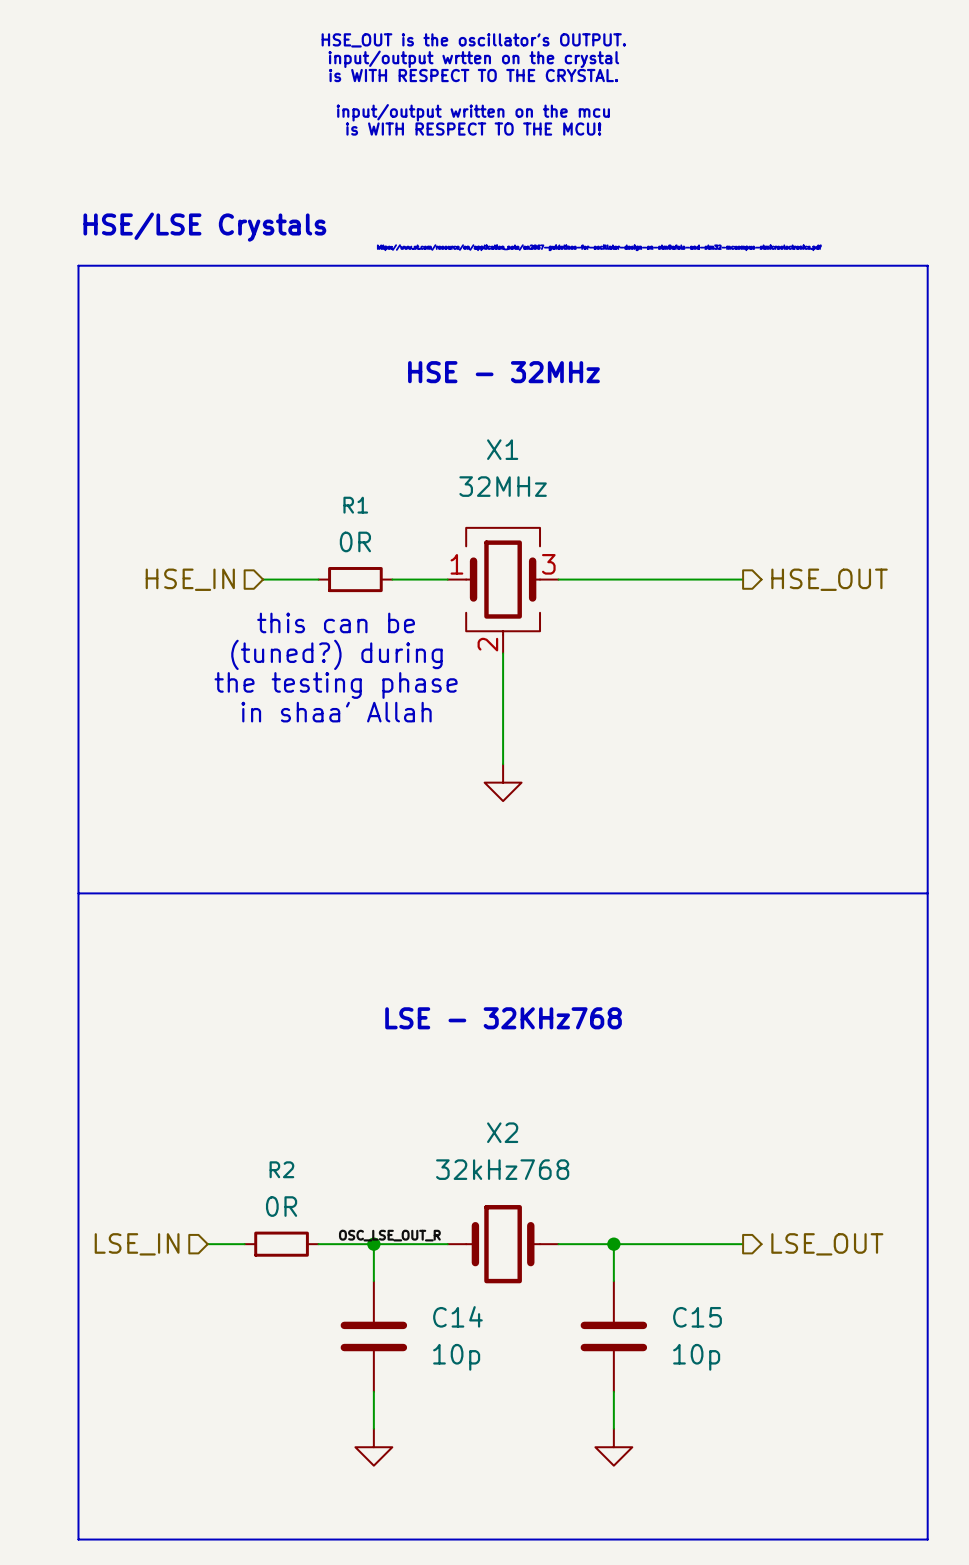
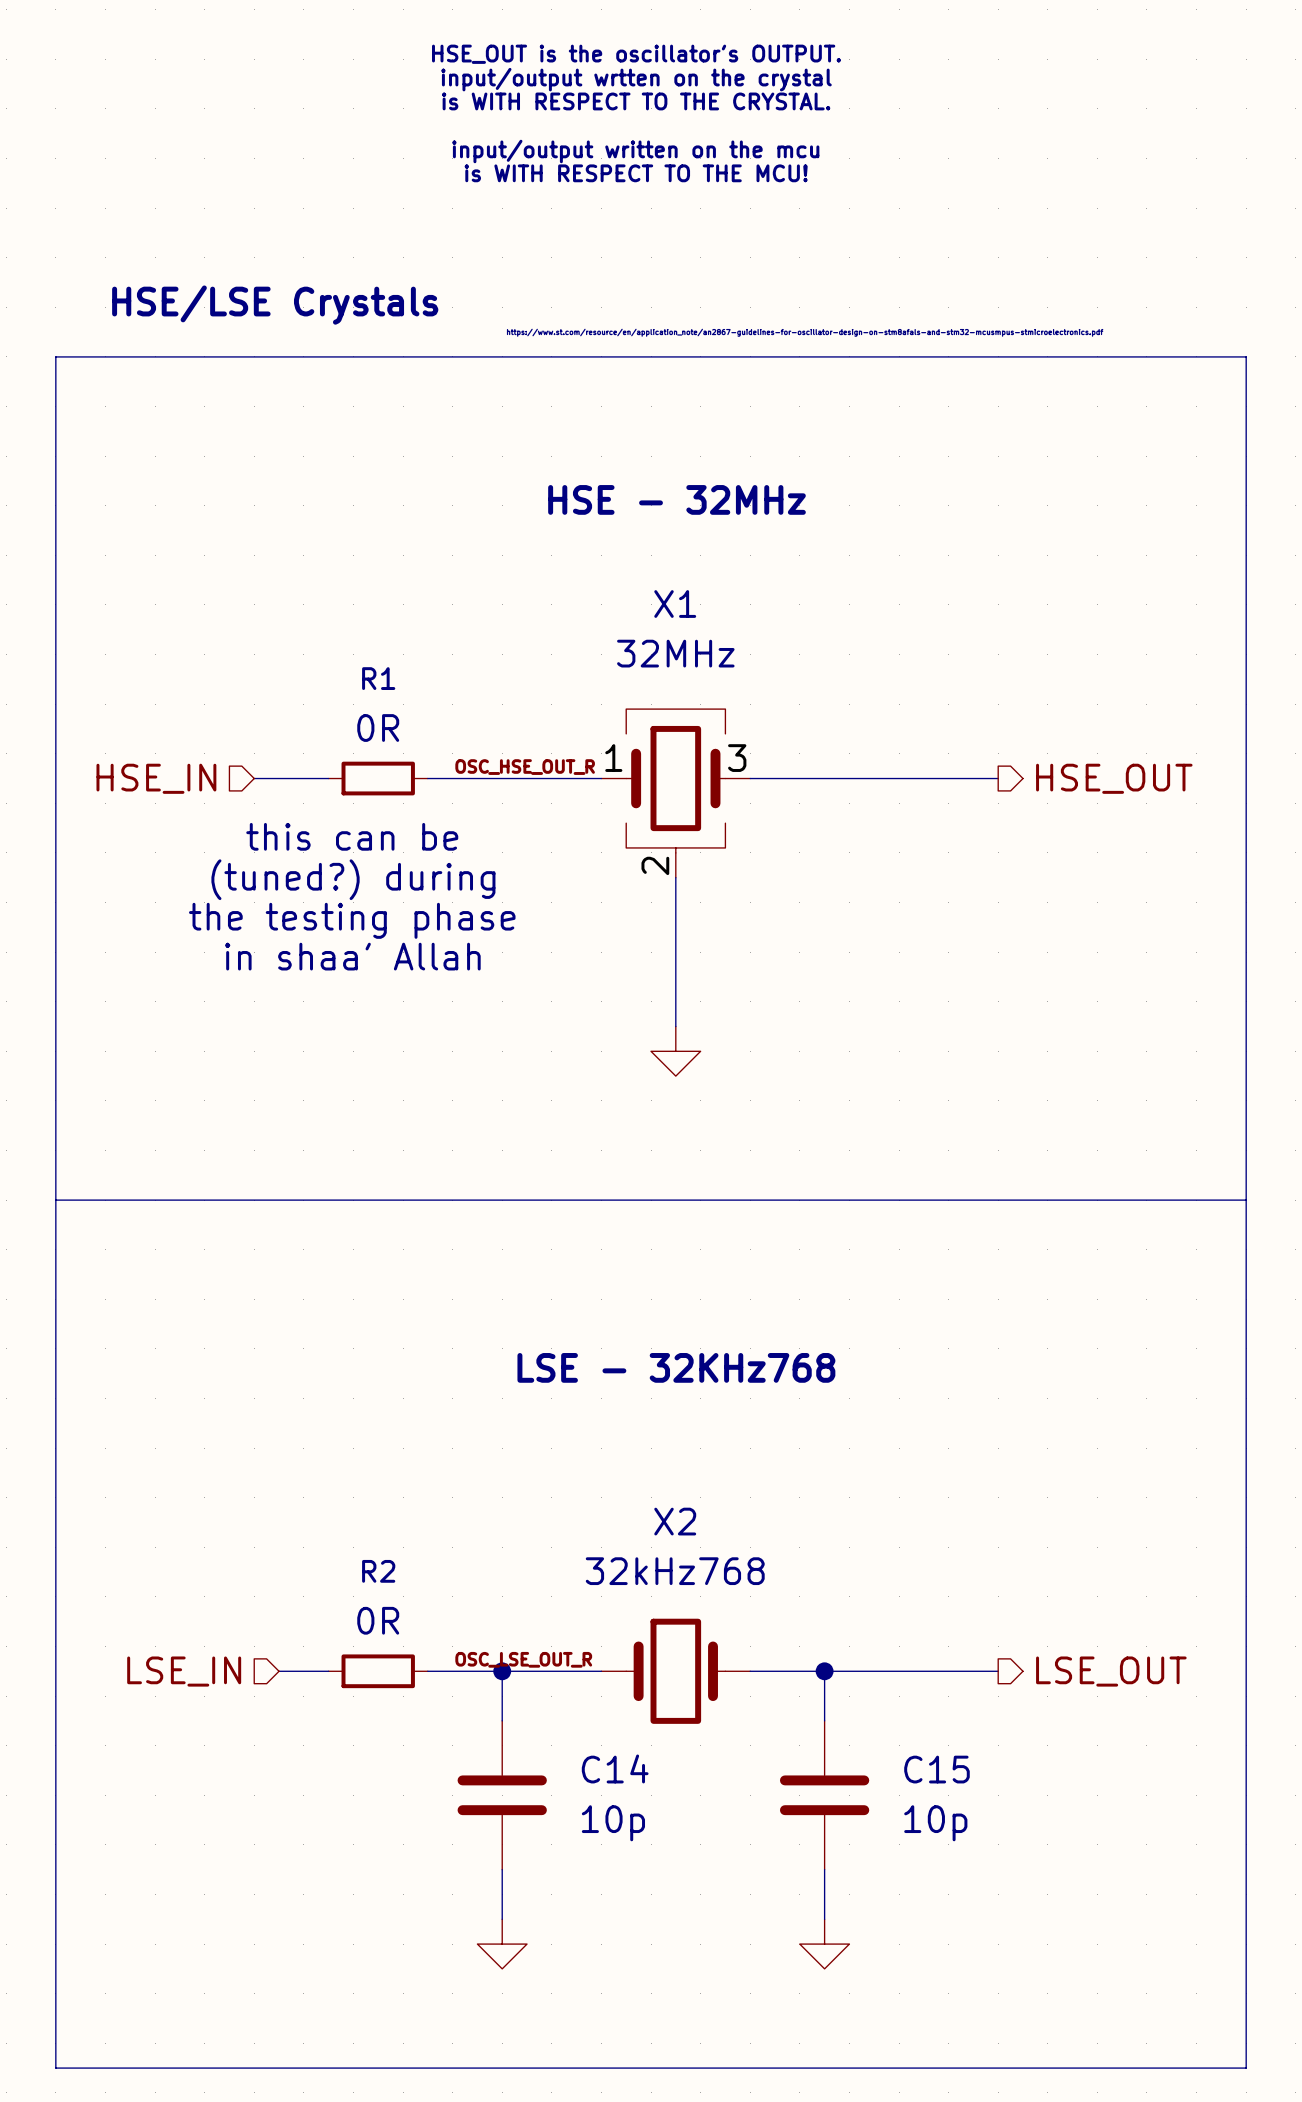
line: (78, 265) (78, 1539) -> (105, 356) (55, 356) (55, 2068) (105, 2068)
label: none -> OSC_HSE_OUT_R (525, 767)
wire: none -> (254, 778) (328, 778)
hierarchical label position: HSE_IN (190, 579) -> HSE_IN (156, 778)
wire: (263, 579) (318, 579) -> (527, 778) (427, 778)
R1 position: (355, 579) -> (378, 778)
text position: this can be (336, 622) -> this can be (352, 836)
text position: (tuned?) during (336, 654) -> (tuned?) during (353, 879)
text position: the testing phase (336, 685) -> the testing phase (352, 920)
text position: in shaa' Allah (336, 712) -> in shaa' Allah (352, 956)
line: none -> (55, 1200) (105, 1200)

